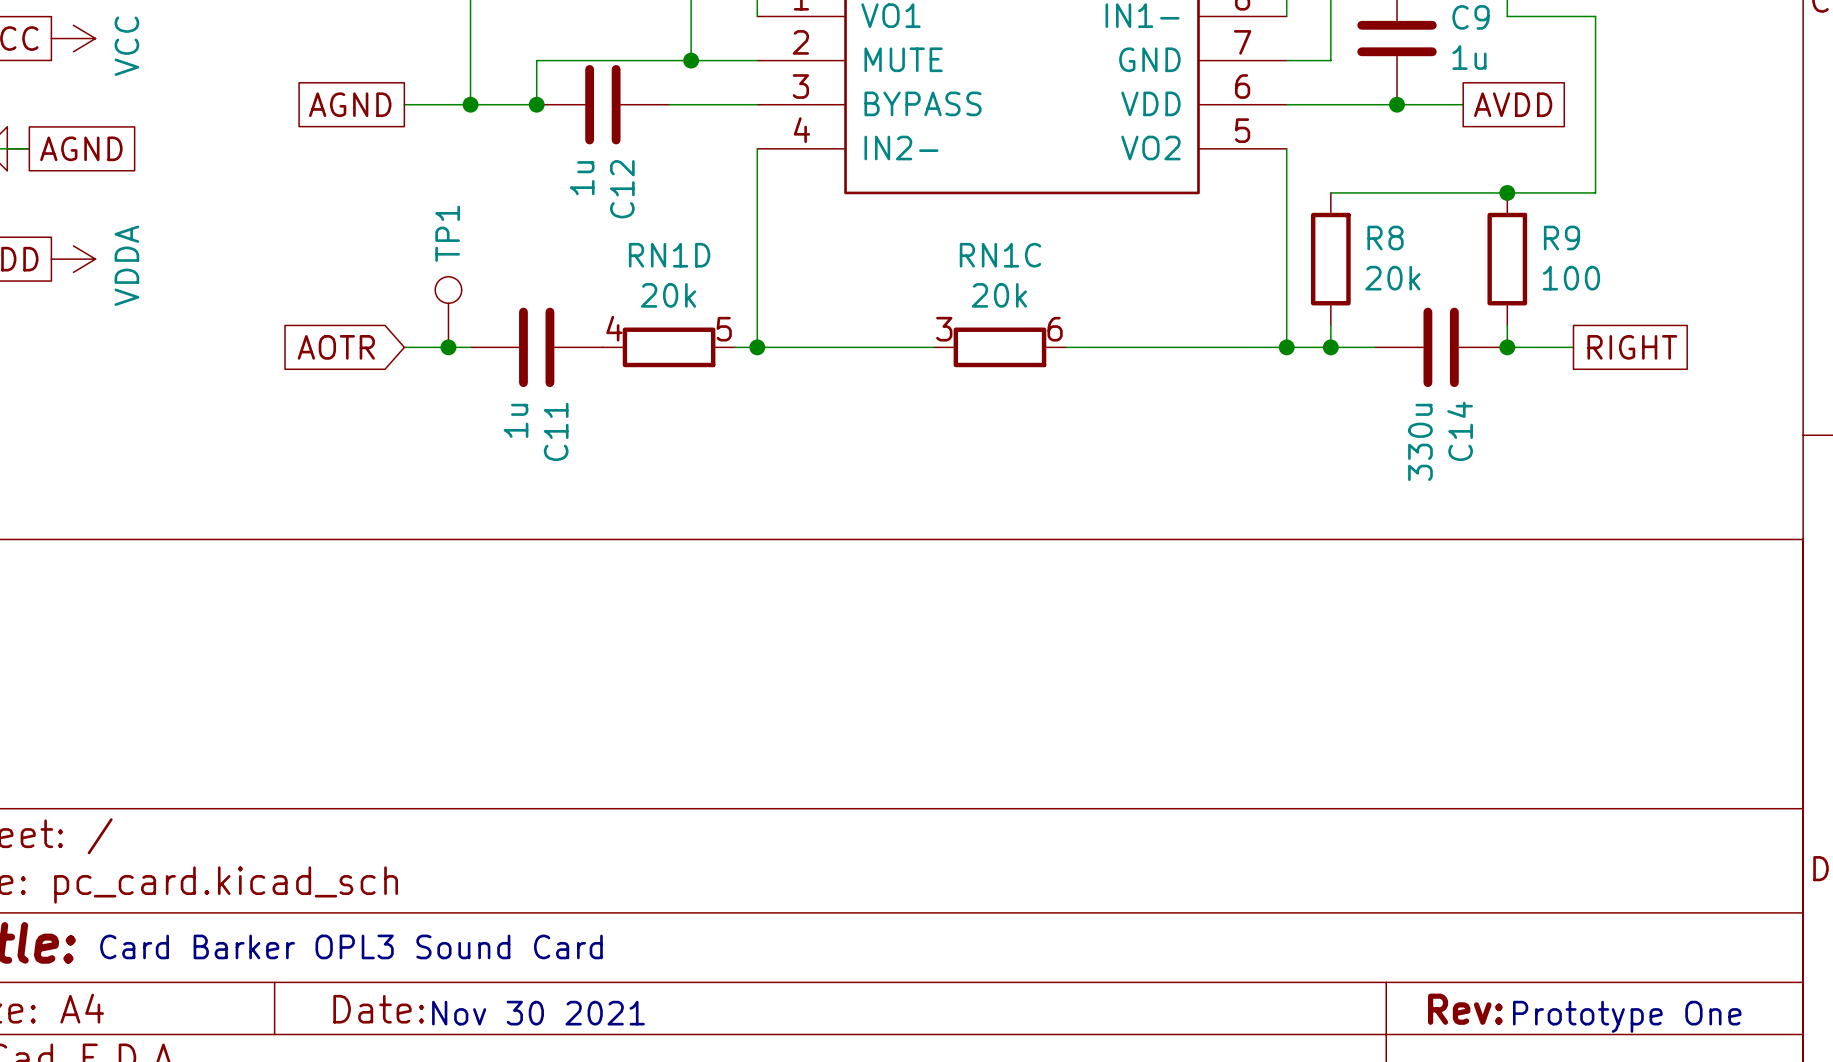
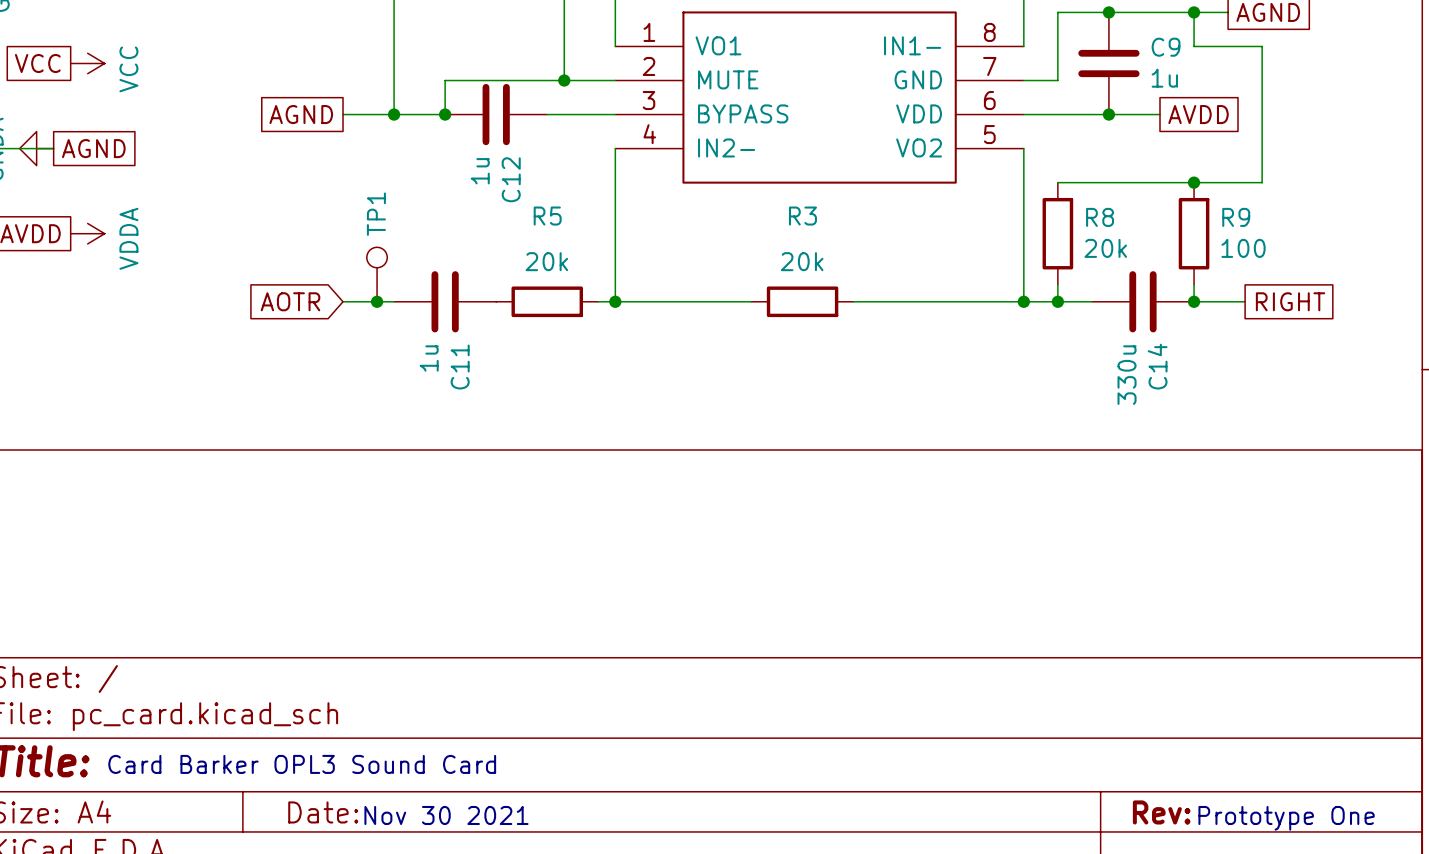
RN1D name: RN1D (669, 255) -> R5 (547, 216)
RN1C name: RN1C (1000, 255) -> R3 (802, 216)
RN1D pin number: 4 (614, 328) -> none
RN1D pin number: 5 (724, 329) -> none
RN1C pin number: 3 (944, 329) -> none
RN1C pin number: 6 (1055, 329) -> none

